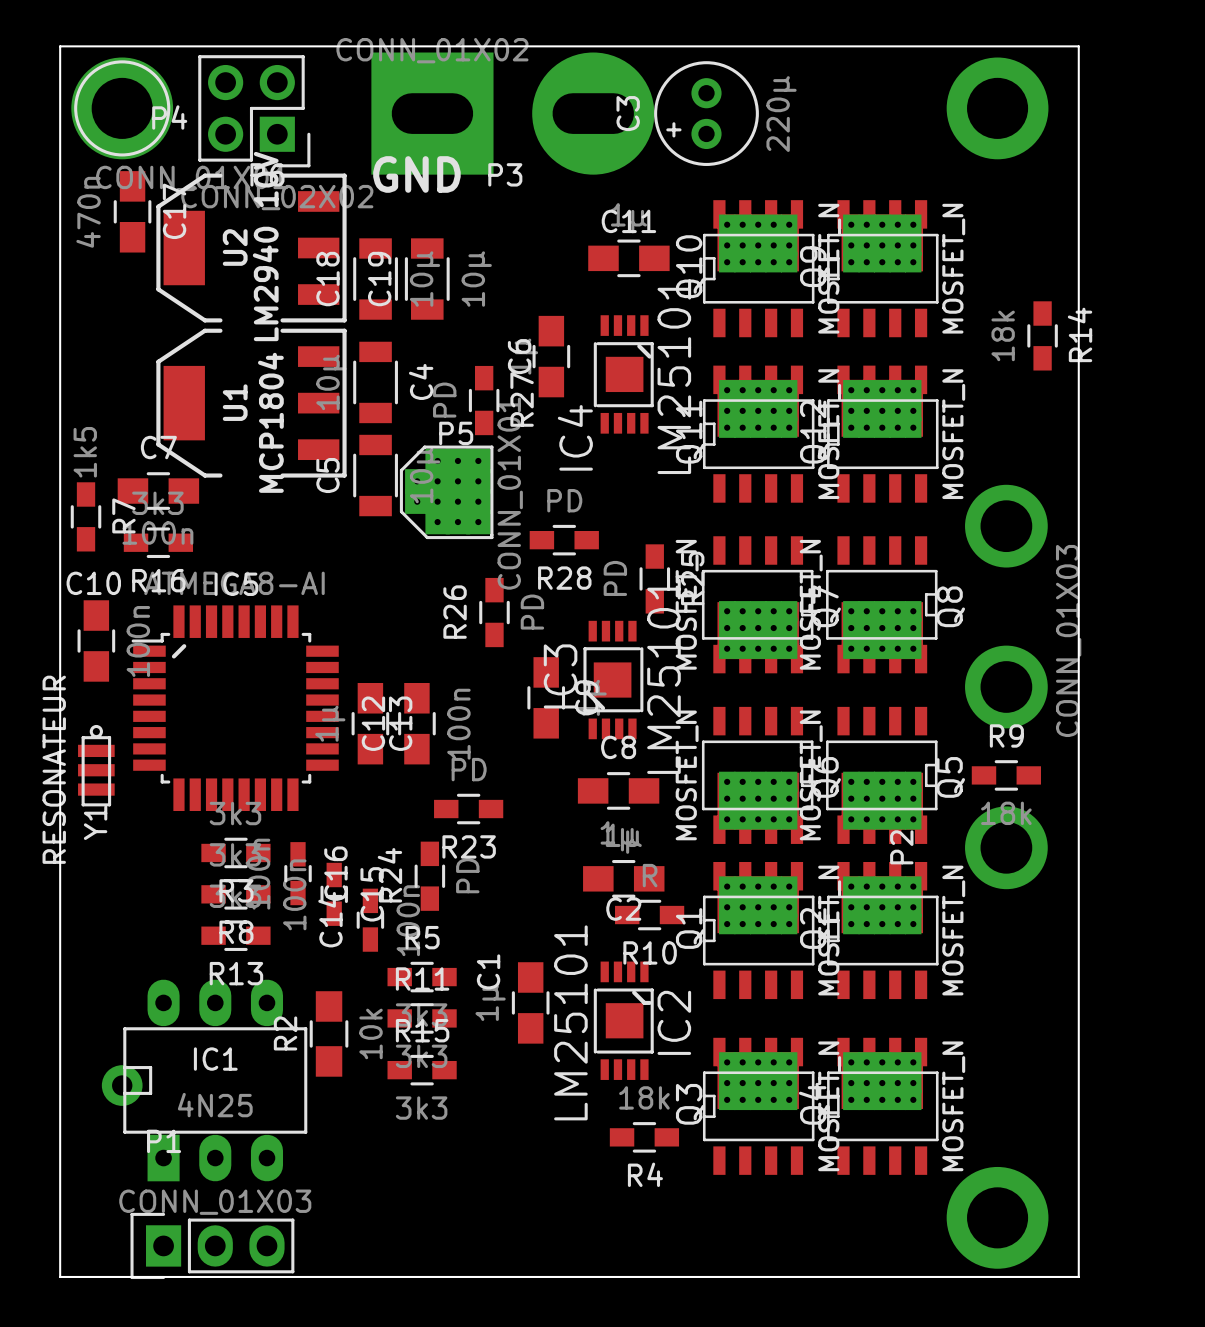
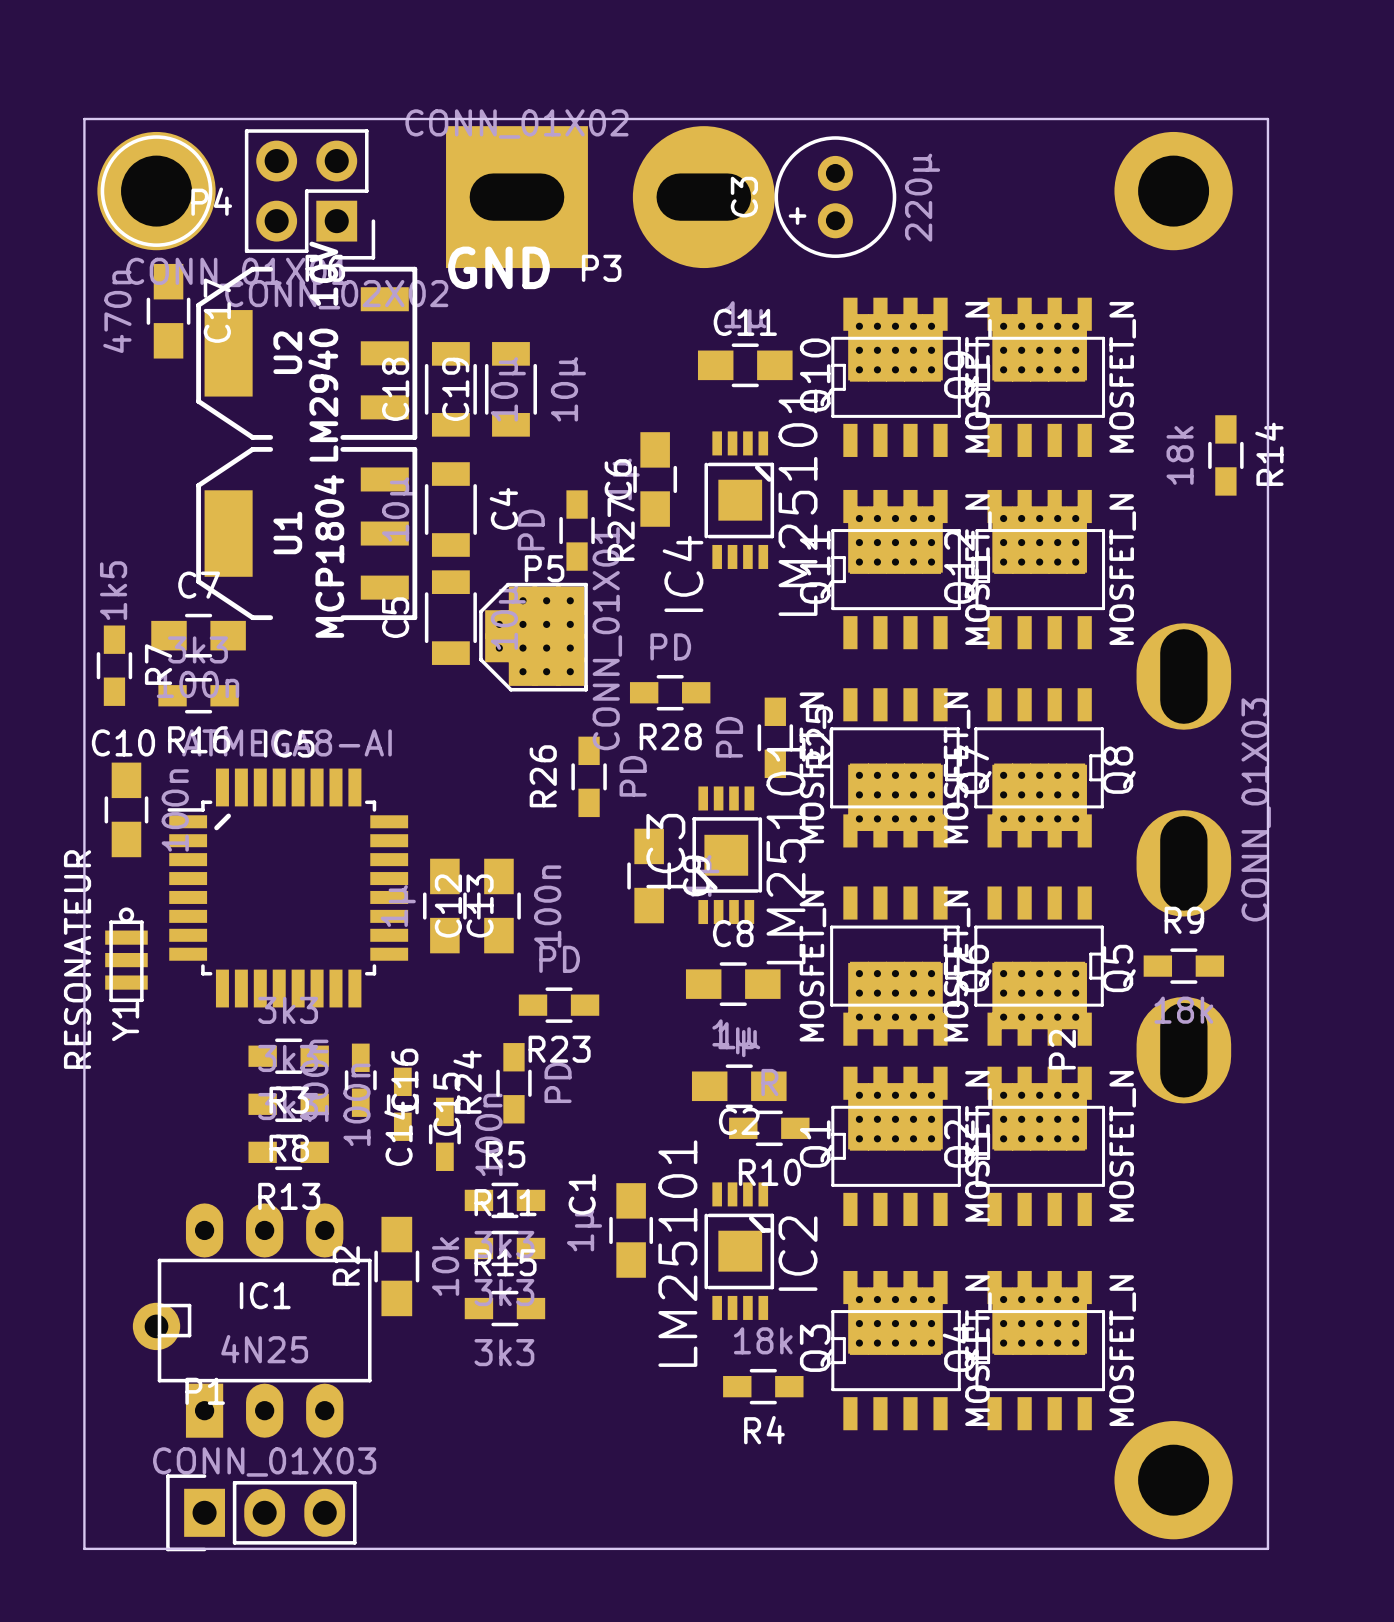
P2 footprint: [965, 484, 1048, 890] -> [1136, 623, 1232, 1104]

